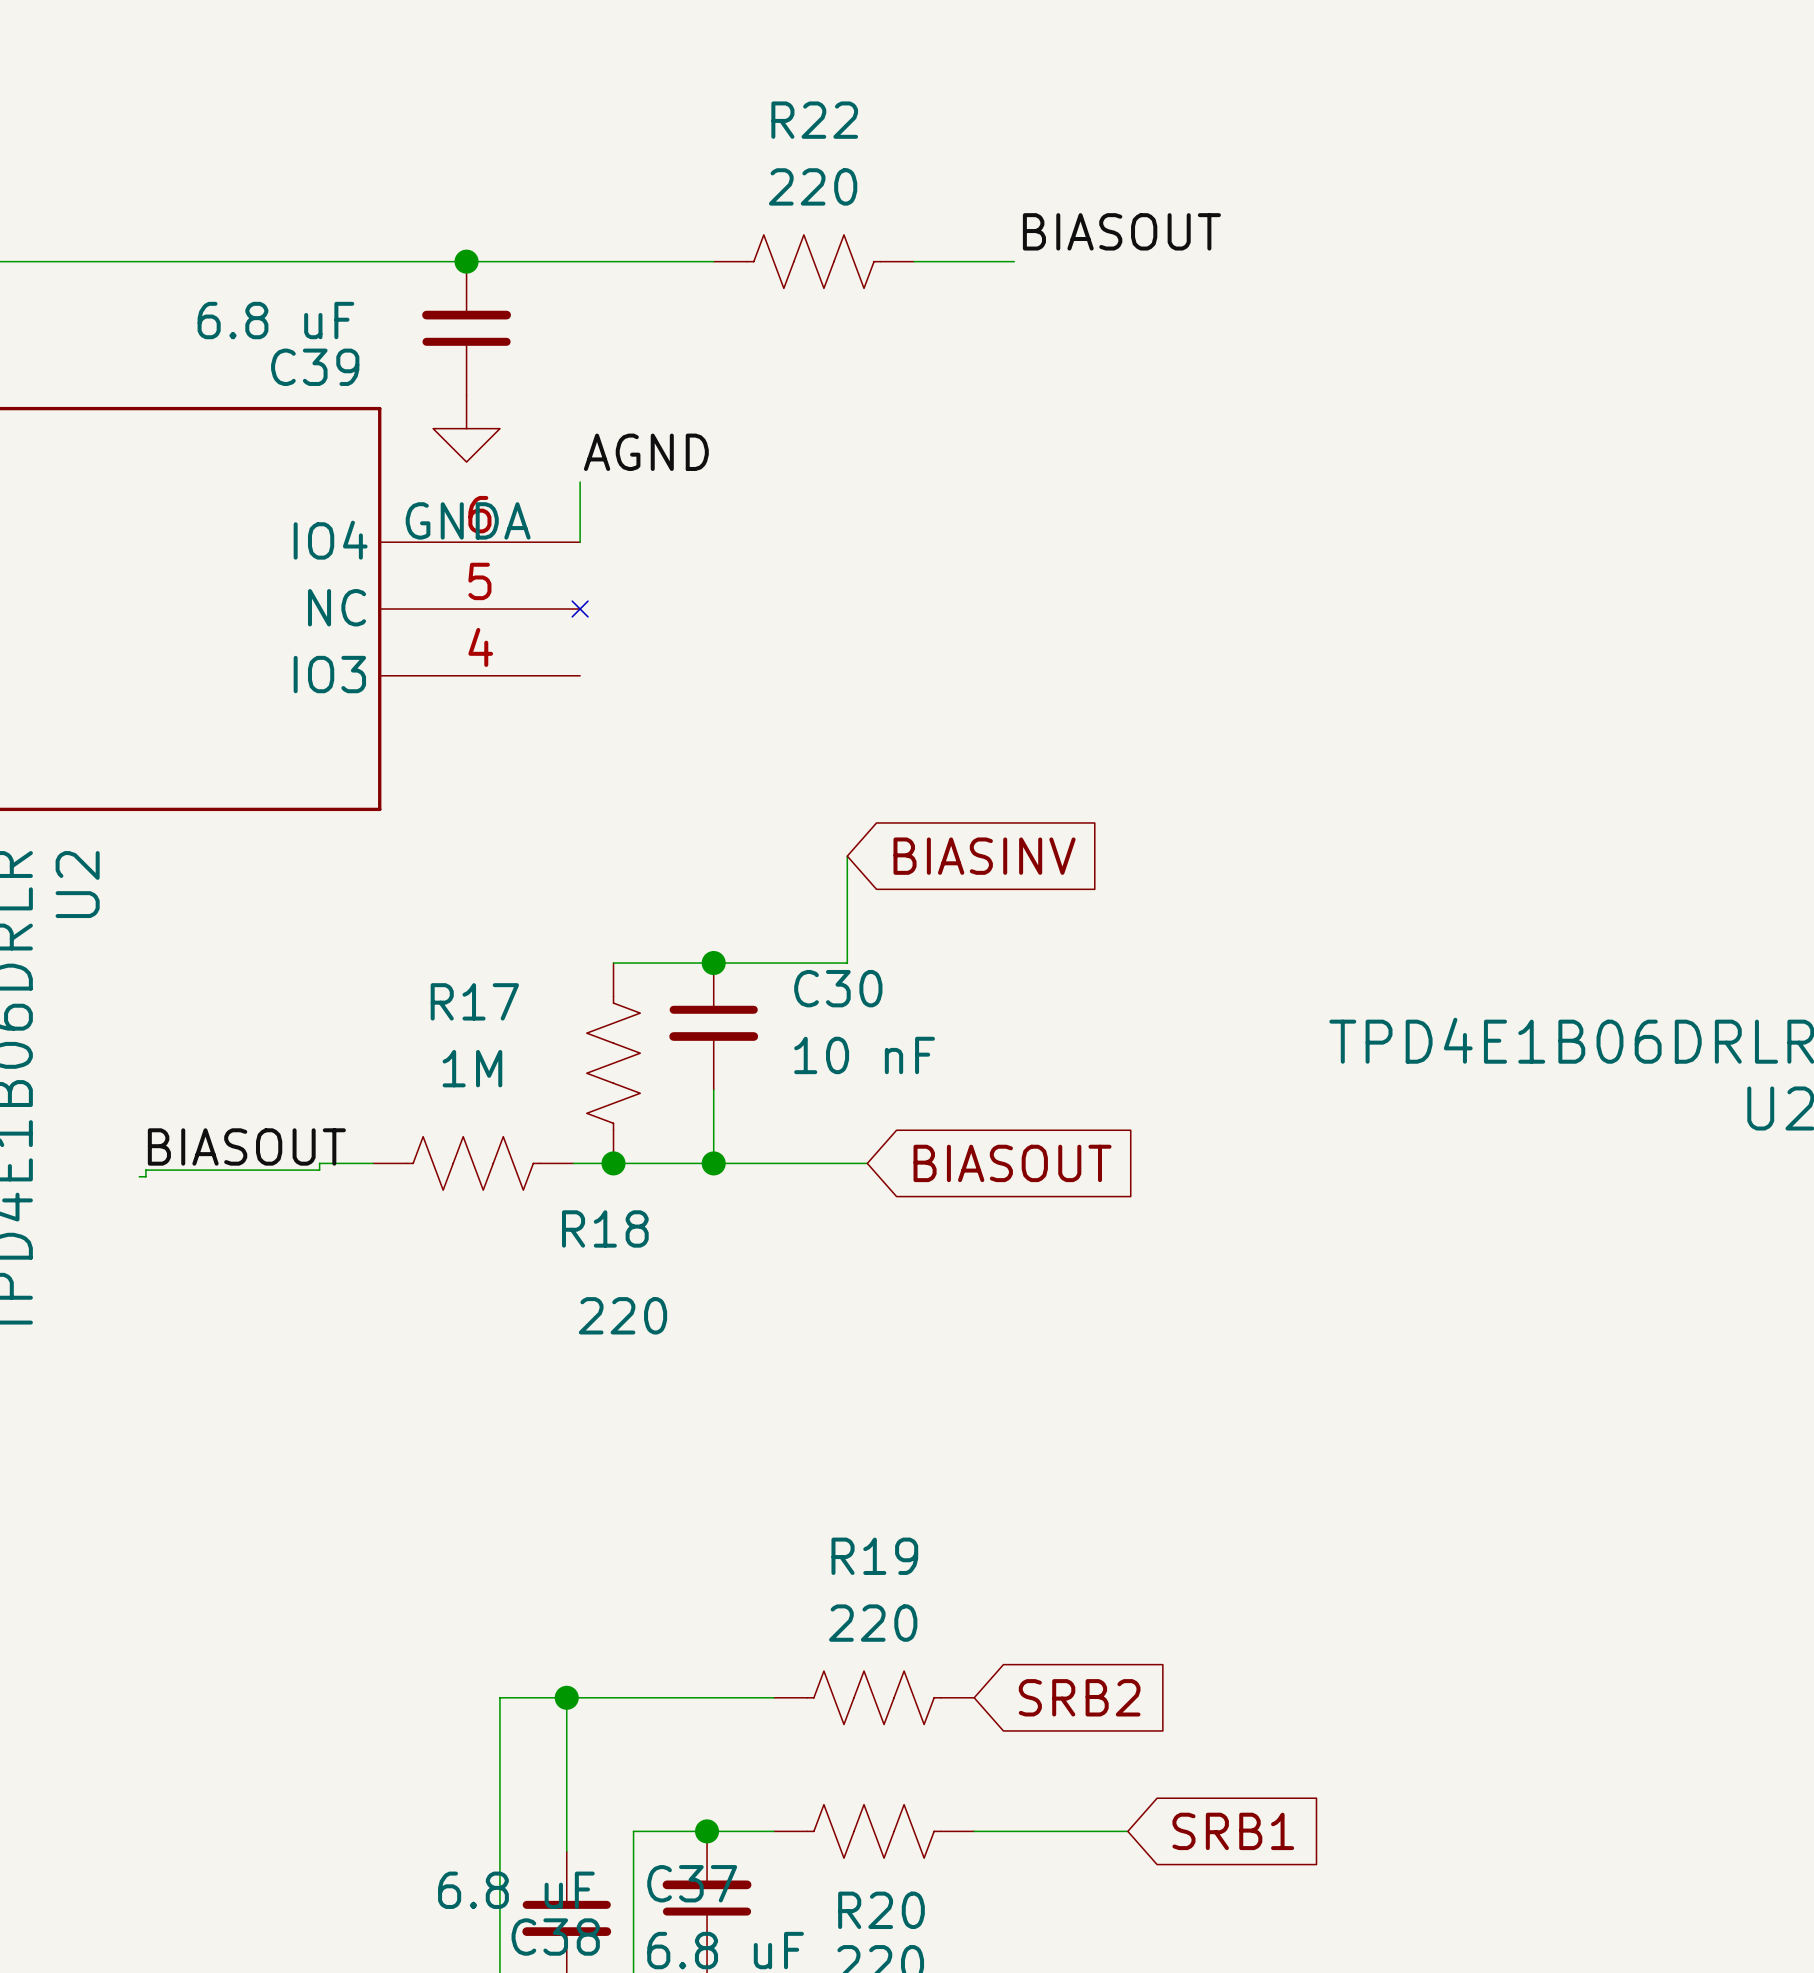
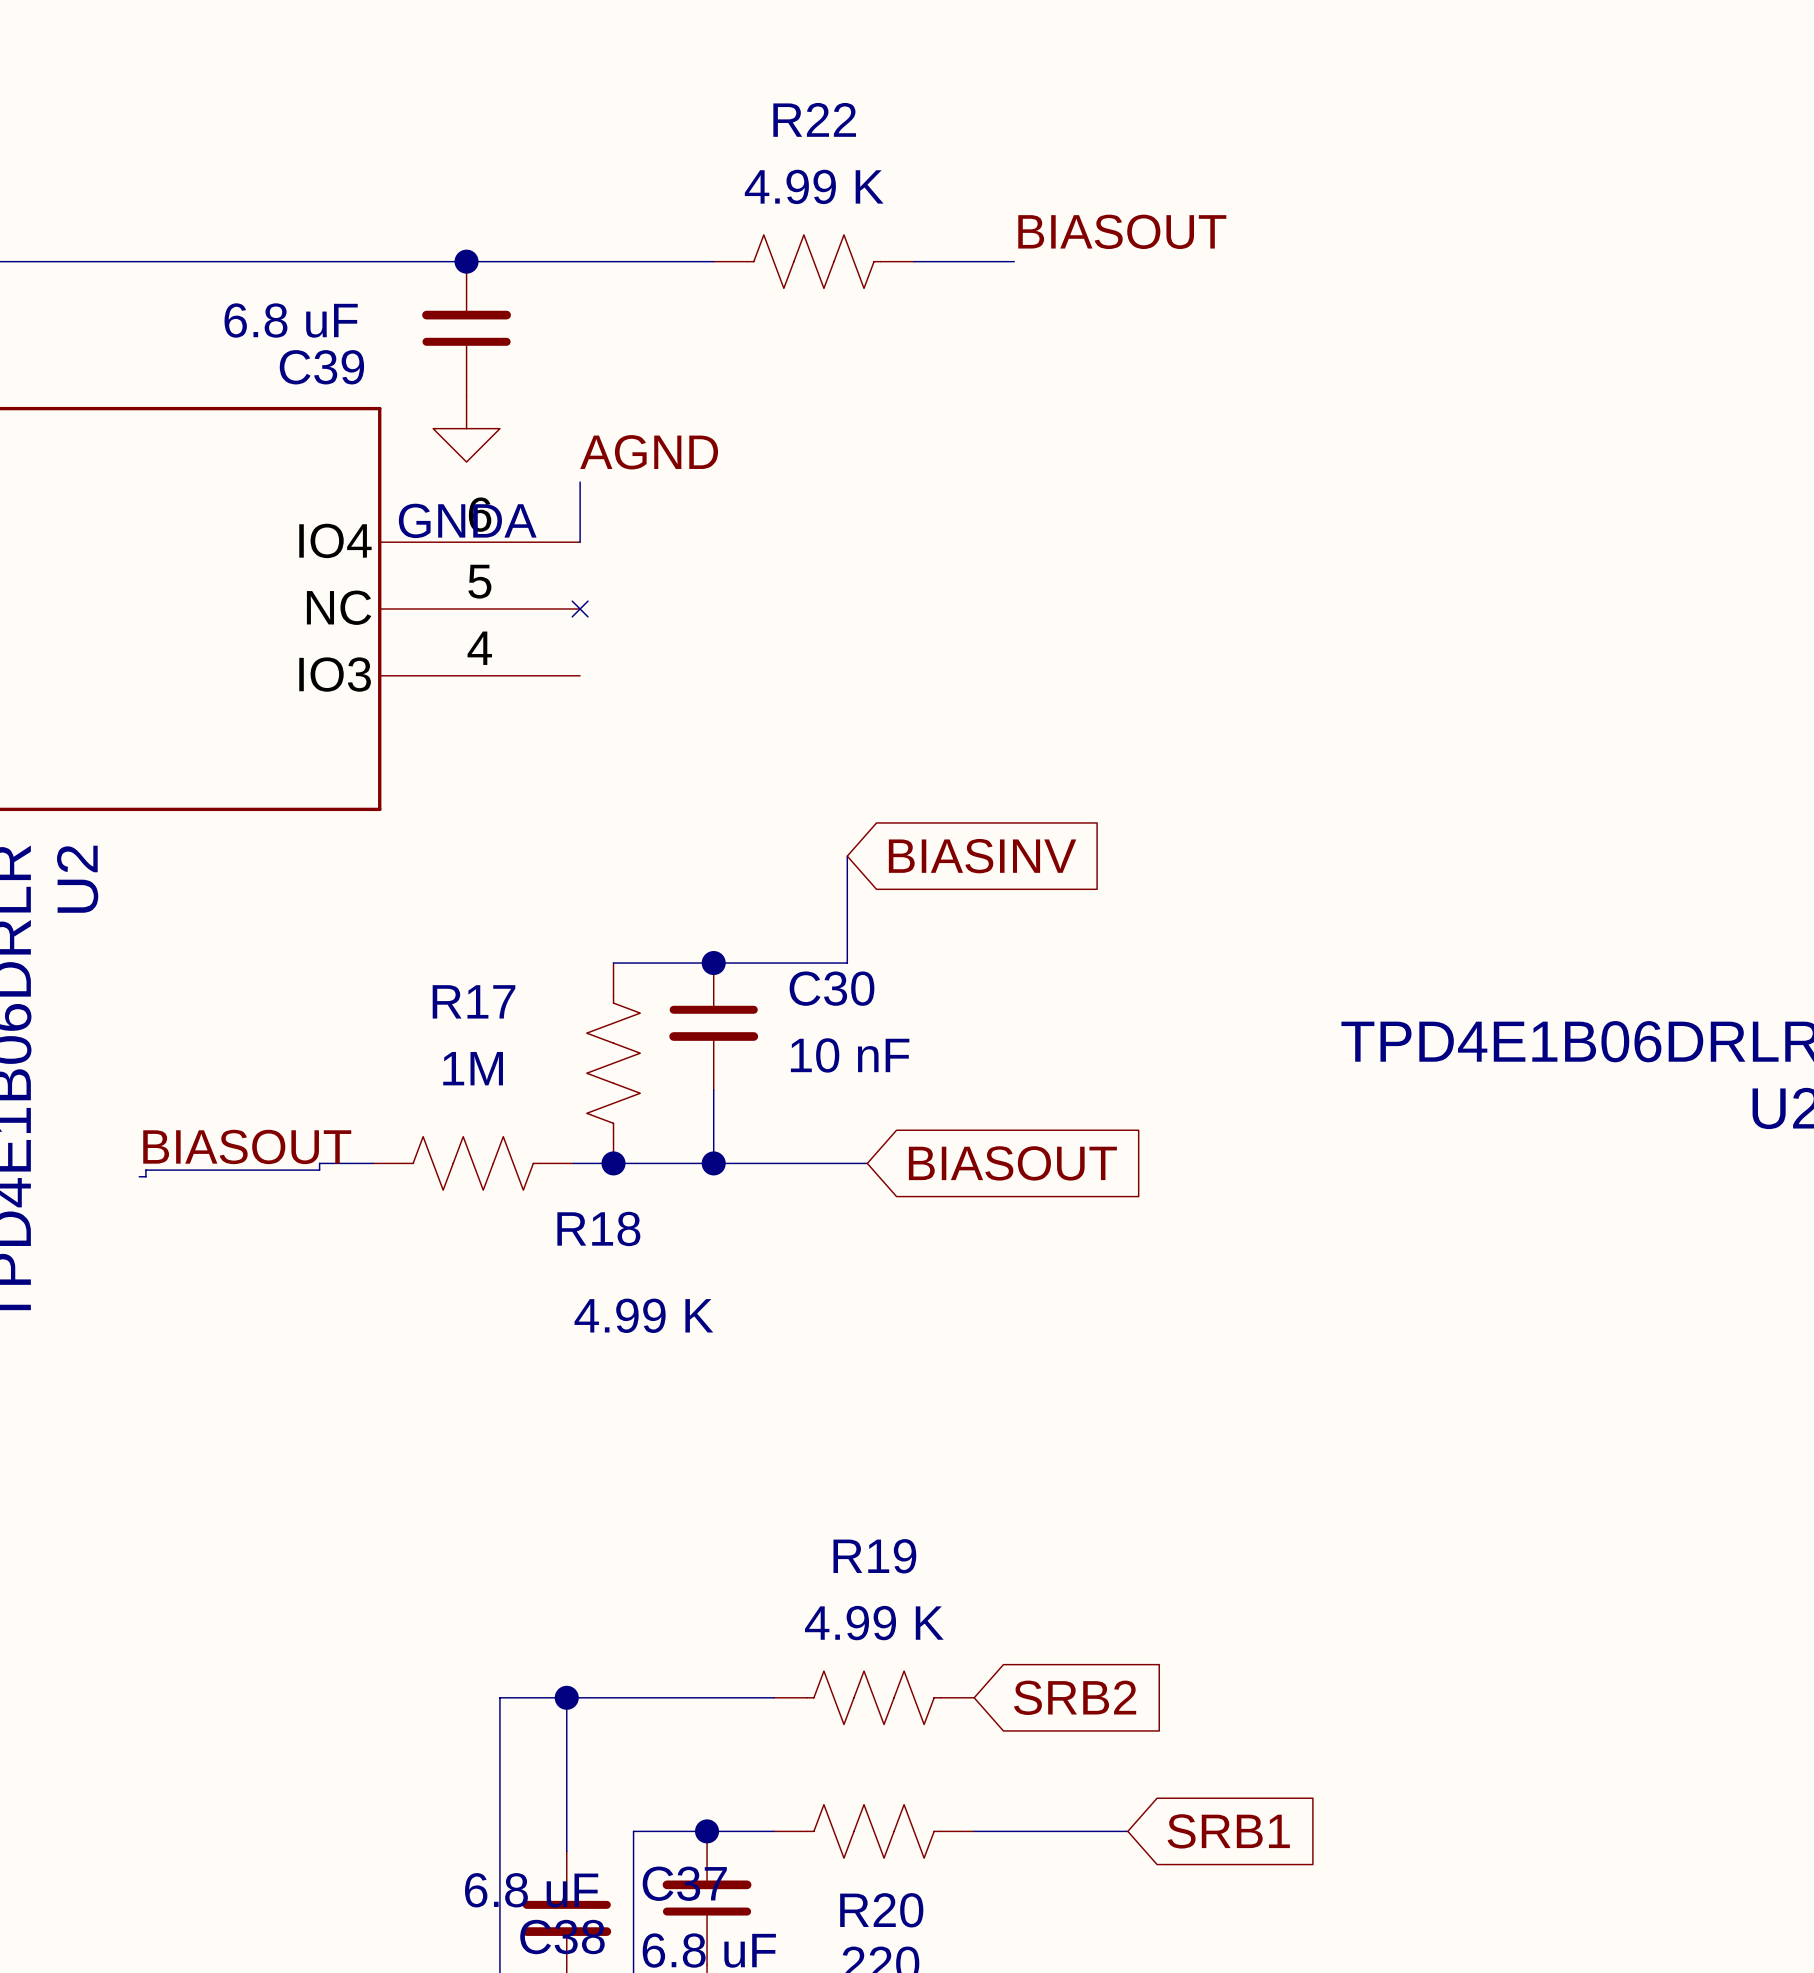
R22 value: 220 (813, 186) -> 4.99 K (814, 186)
R18 value: 220 (622, 1315) -> 4.99 K (643, 1315)
R19 value: 220 (873, 1623) -> 4.99 K (874, 1623)

